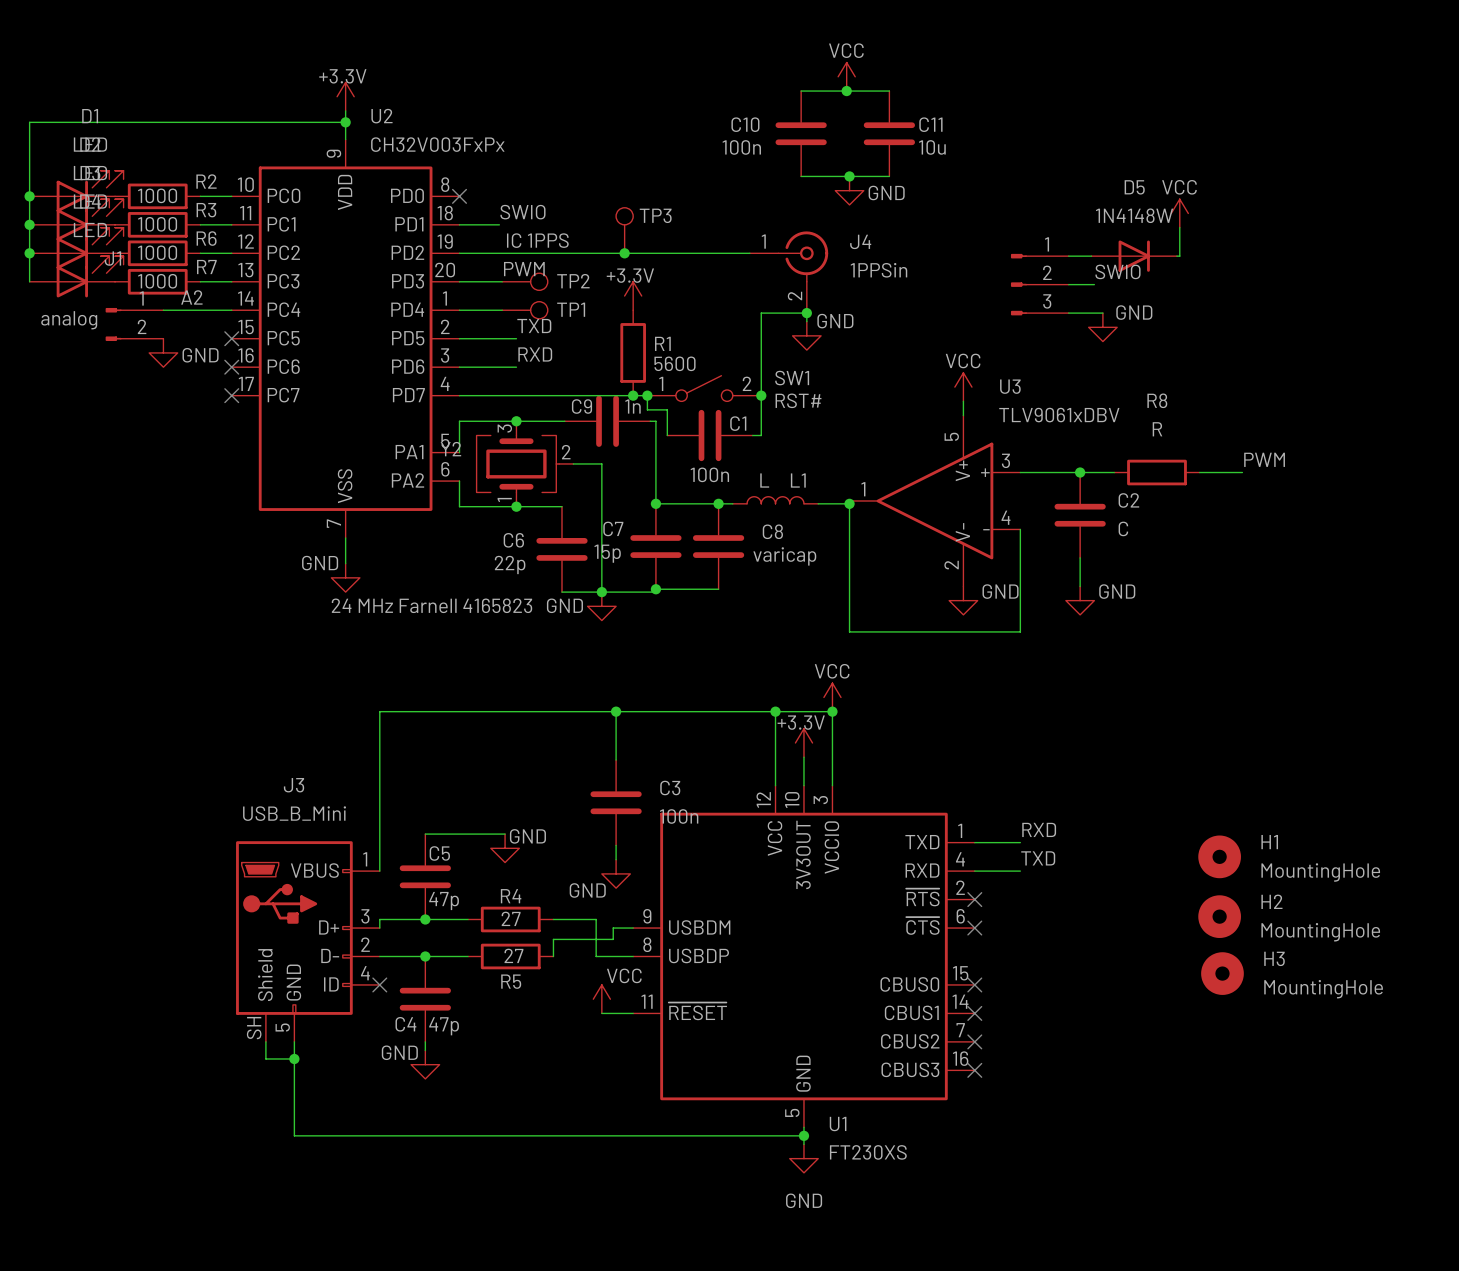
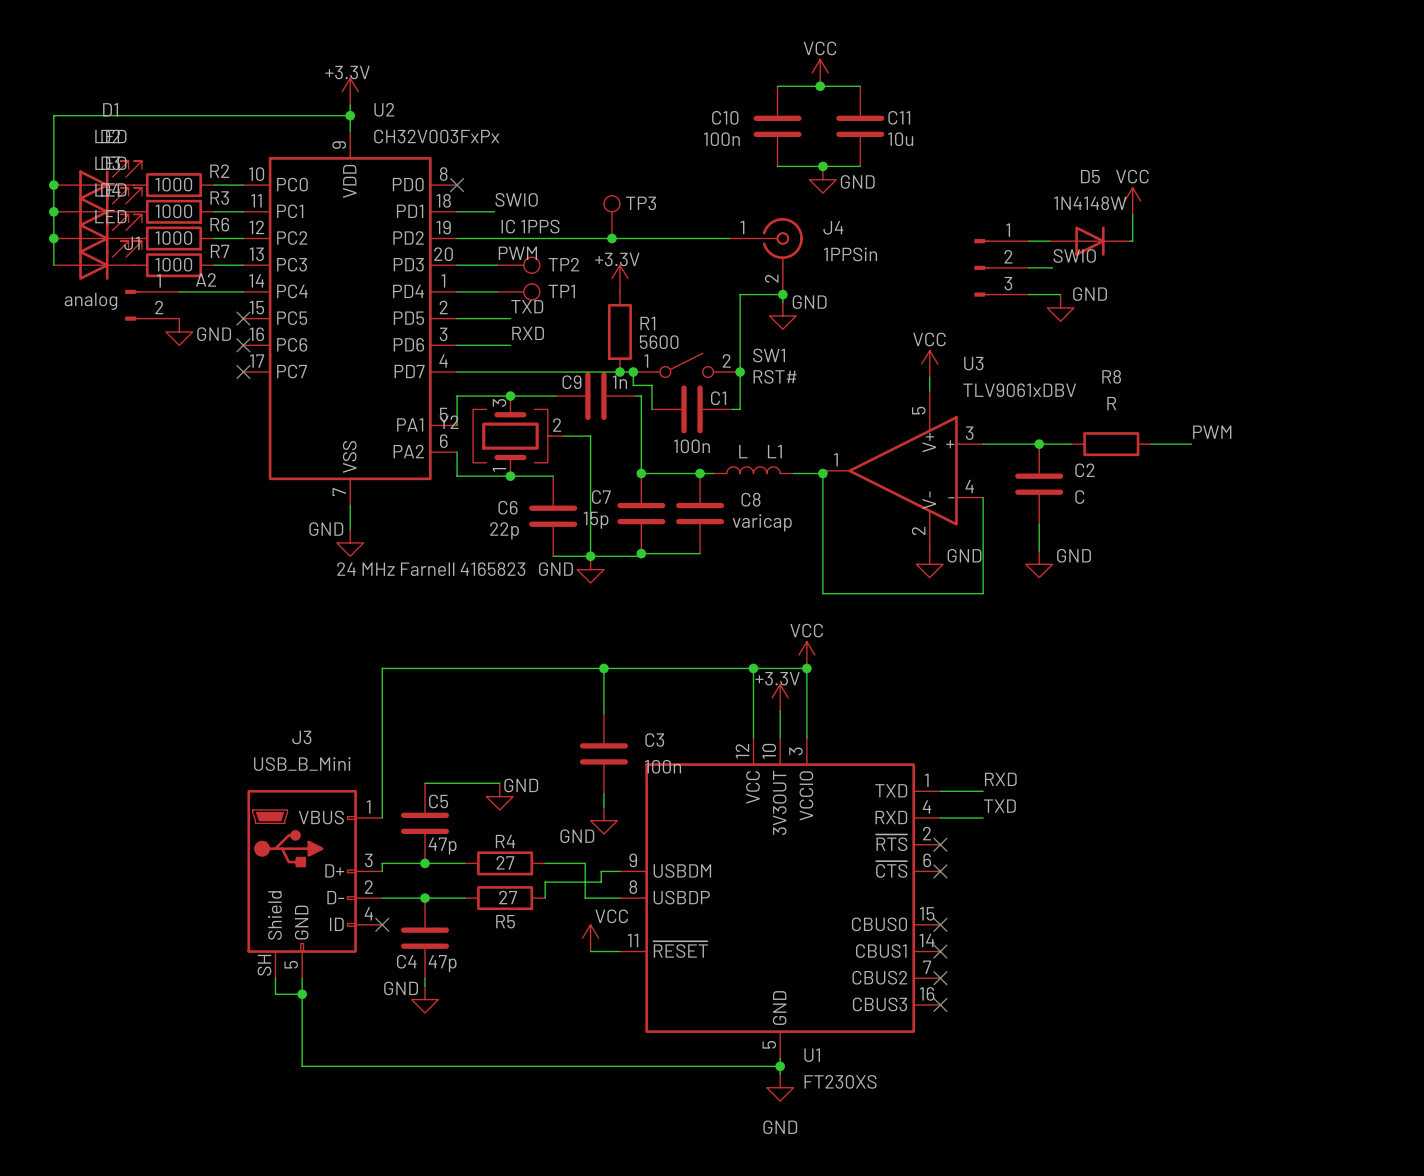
H1: MountingHole (1219, 856) -> none
H2: MountingHole (1219, 916) -> none
H3: MountingHole (1222, 973) -> none

